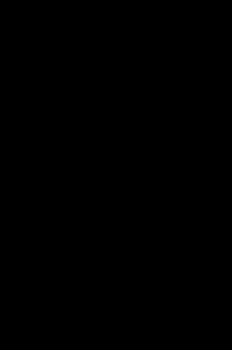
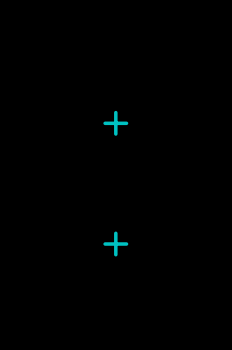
text: none -> + (115, 123)
text: none -> + (115, 244)

